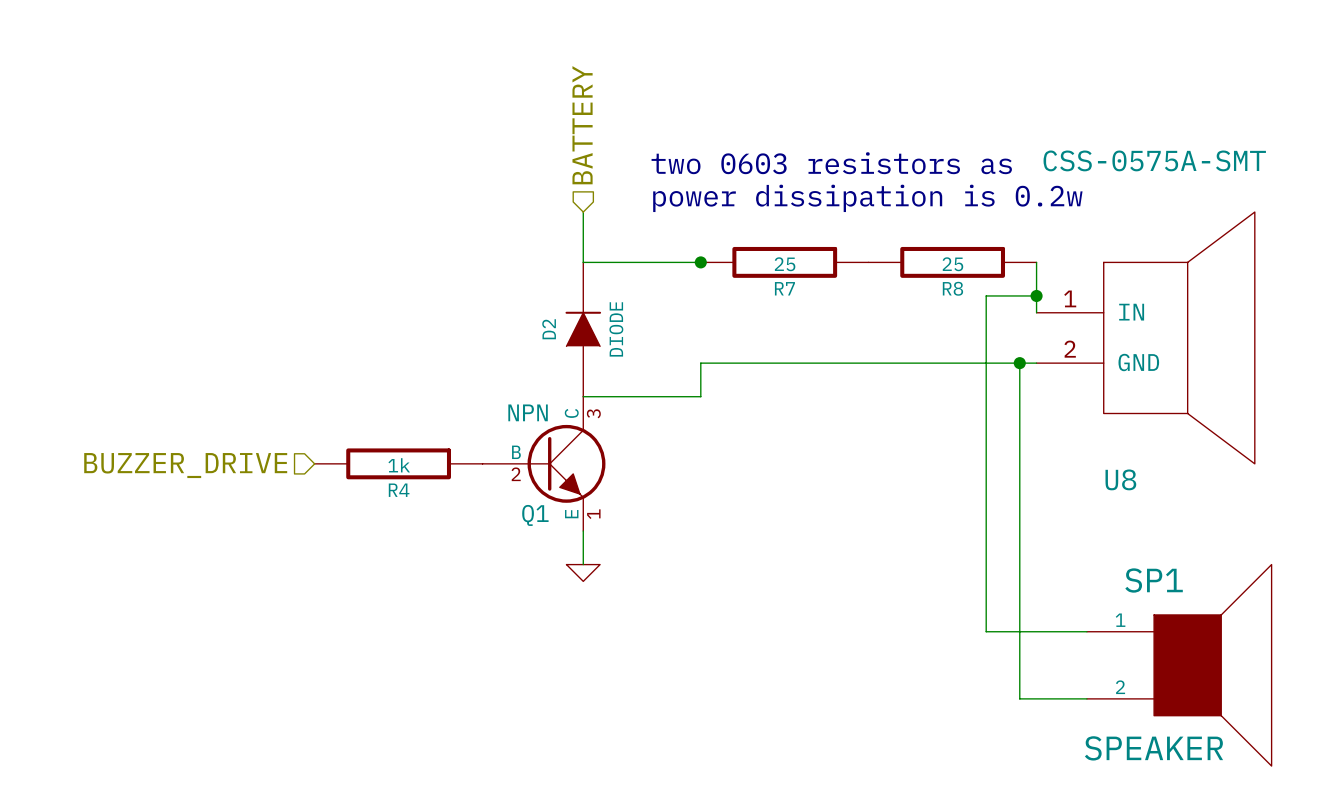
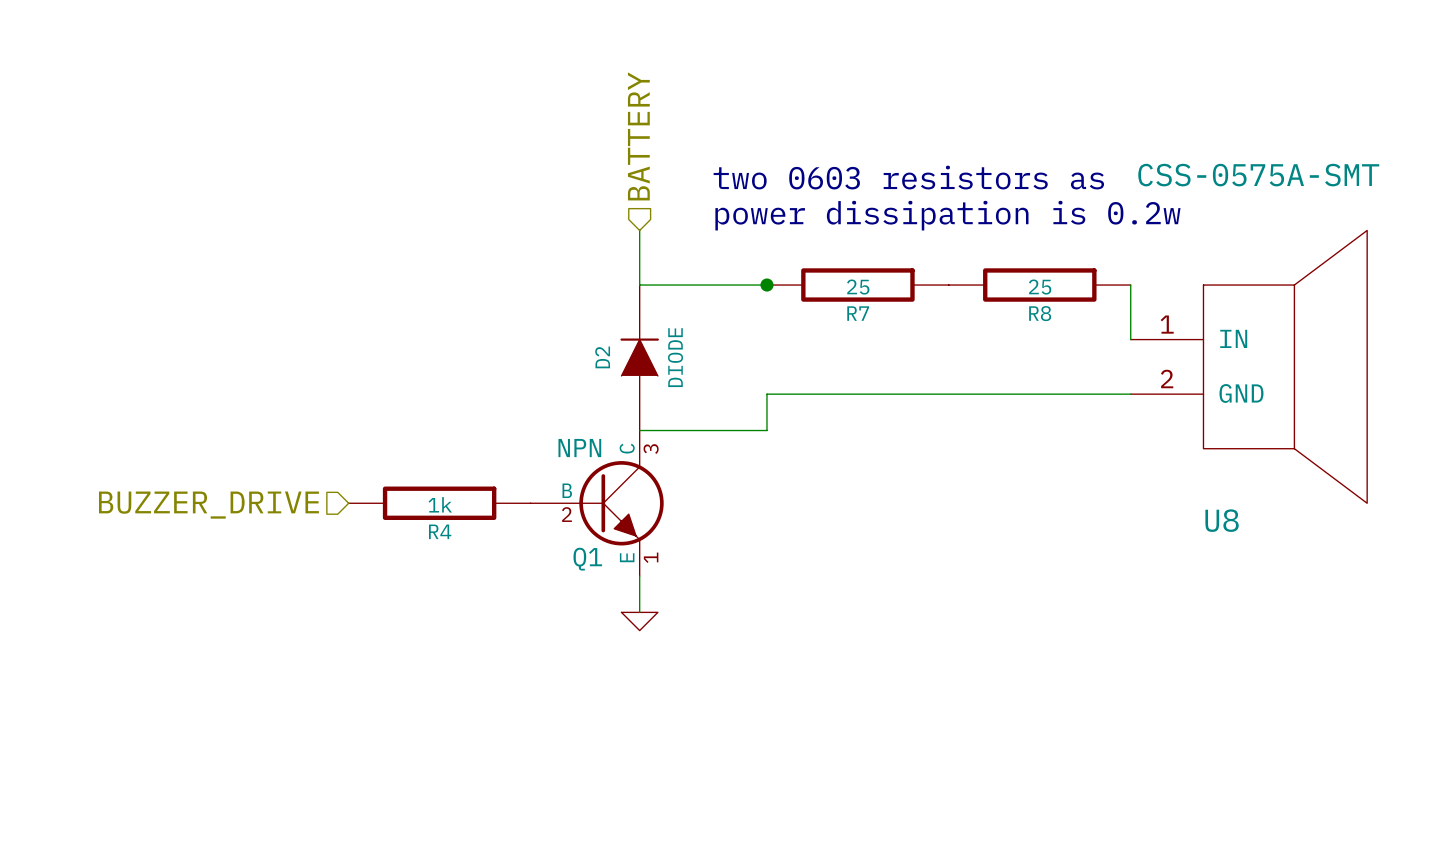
wire: (1036, 295) (986, 295) (986, 631) (1086, 631) -> none
junction: (1036, 295) -> none
wire: (1019, 363) (1019, 698) (1086, 698) -> none
junction: (1019, 363) -> none
SP1: SPEAKER (1179, 665) -> none

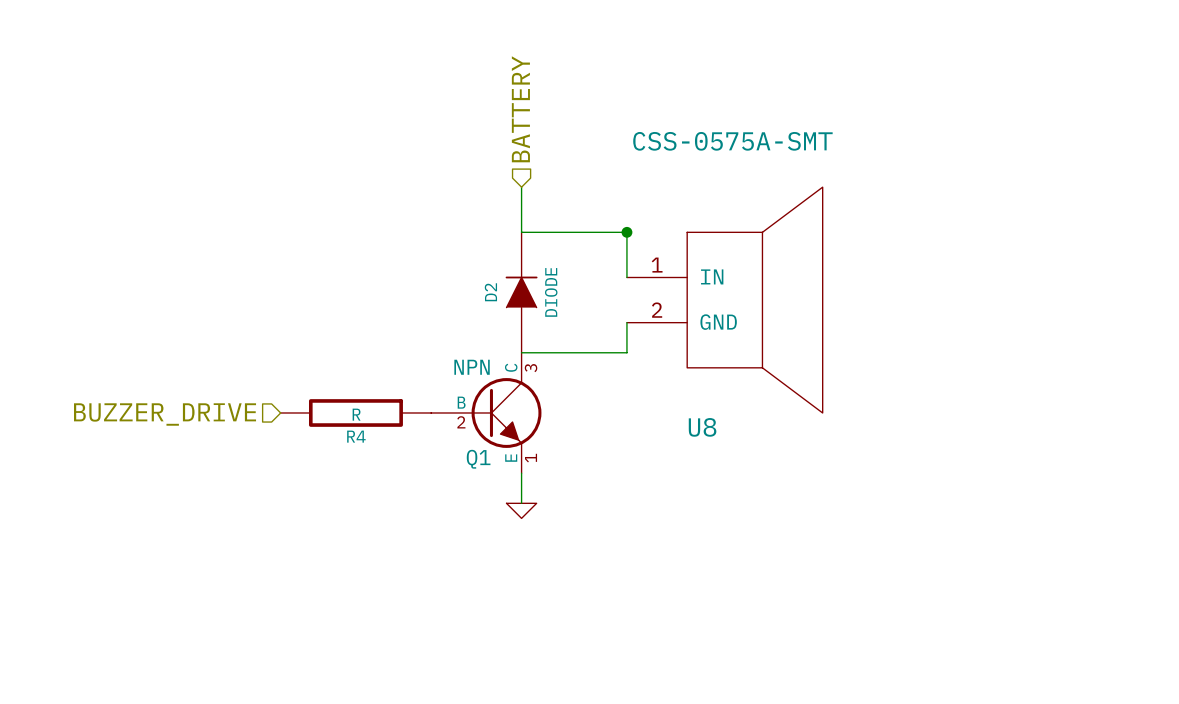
text: two 0603 resistors as (908, 177) -> none
text: power dissipation is 0.2w (947, 215) -> none
wire: none -> (626, 232) (626, 277)
R7: 25 (857, 285) -> none
R8: 25 (1039, 285) -> none
wire: (1130, 285) (1130, 339) -> none
U8 position: (1248, 366) -> (724, 300)
wire: (766, 394) (1130, 394) -> none
R4 value: 1k (440, 504) -> R (356, 414)

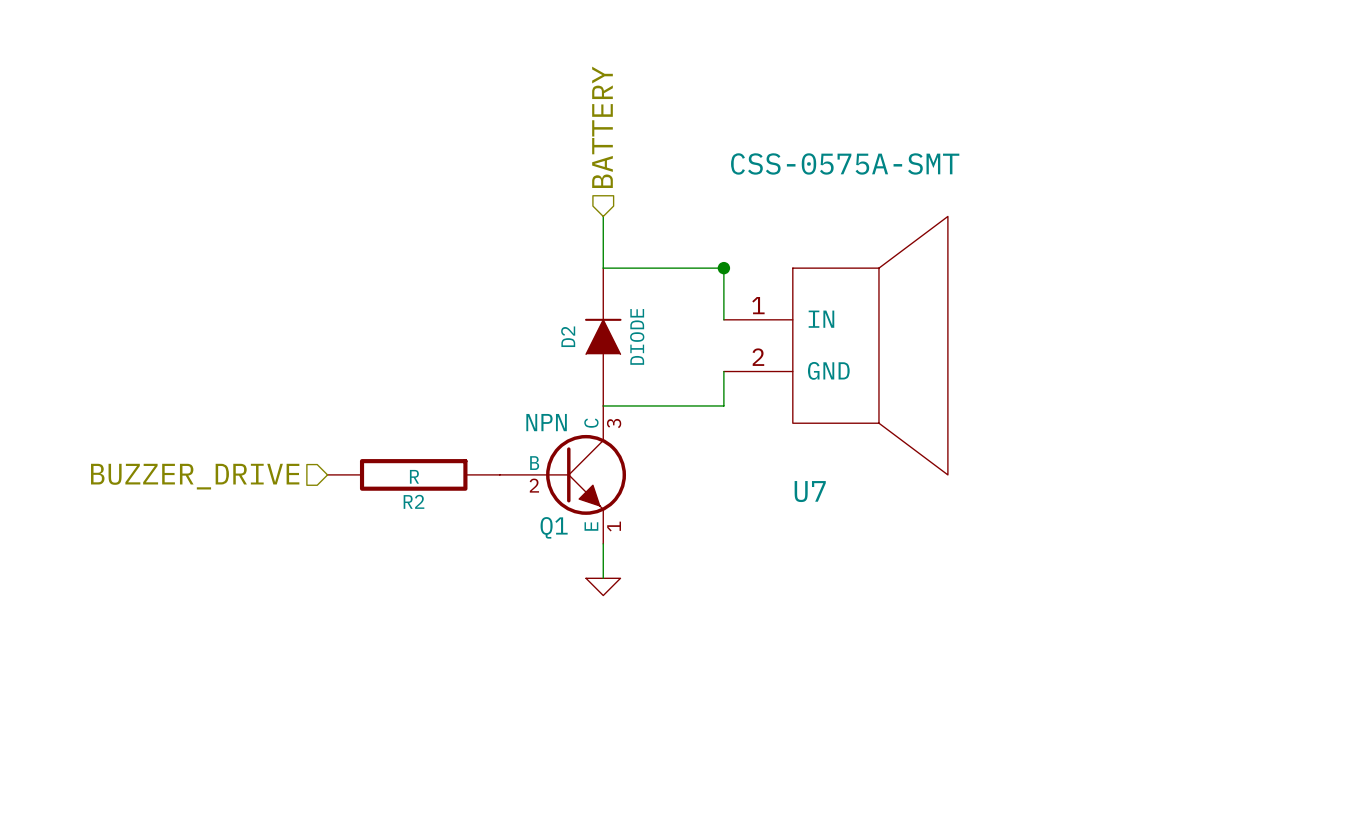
U8 name: U8 (702, 427) -> U7 (810, 491)
R4 name: R4 (356, 436) -> R2 (413, 501)

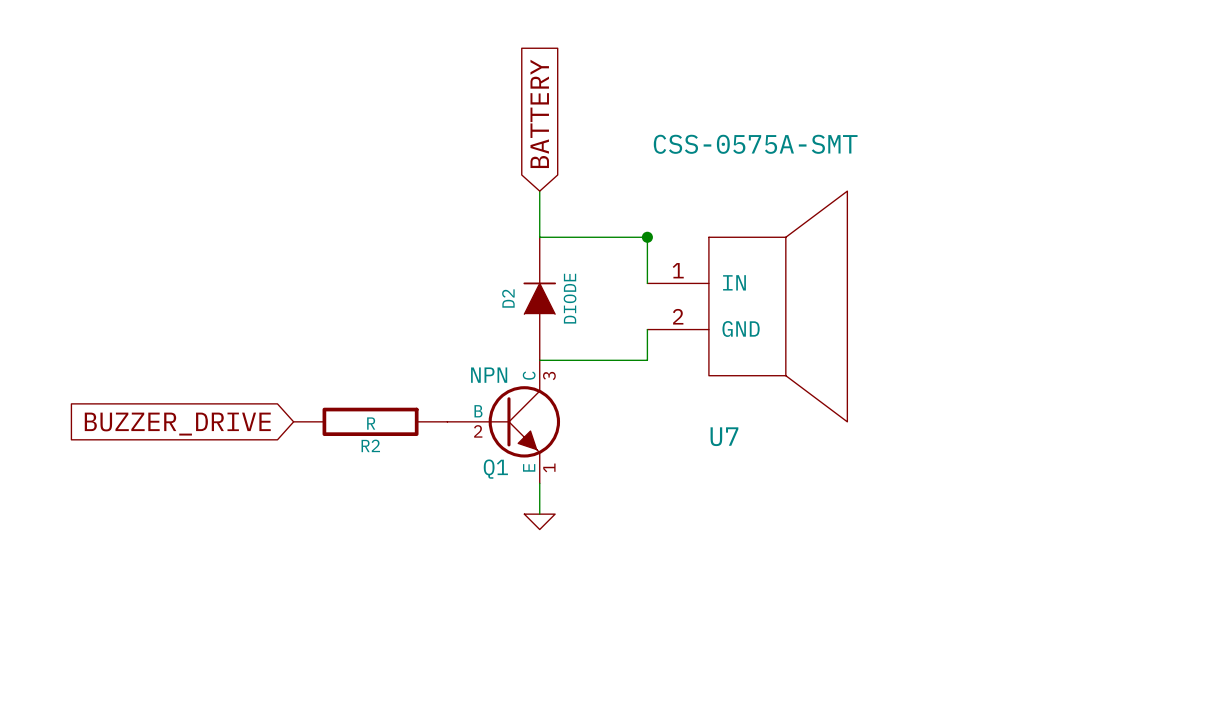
hierarchical label: BATTERY (602, 127) -> none
global label: none -> BATTERY (539, 113)
hierarchical label: BUZZER_DRIVE (195, 476) -> none
global label: none -> BUZZER_DRIVE (177, 424)

